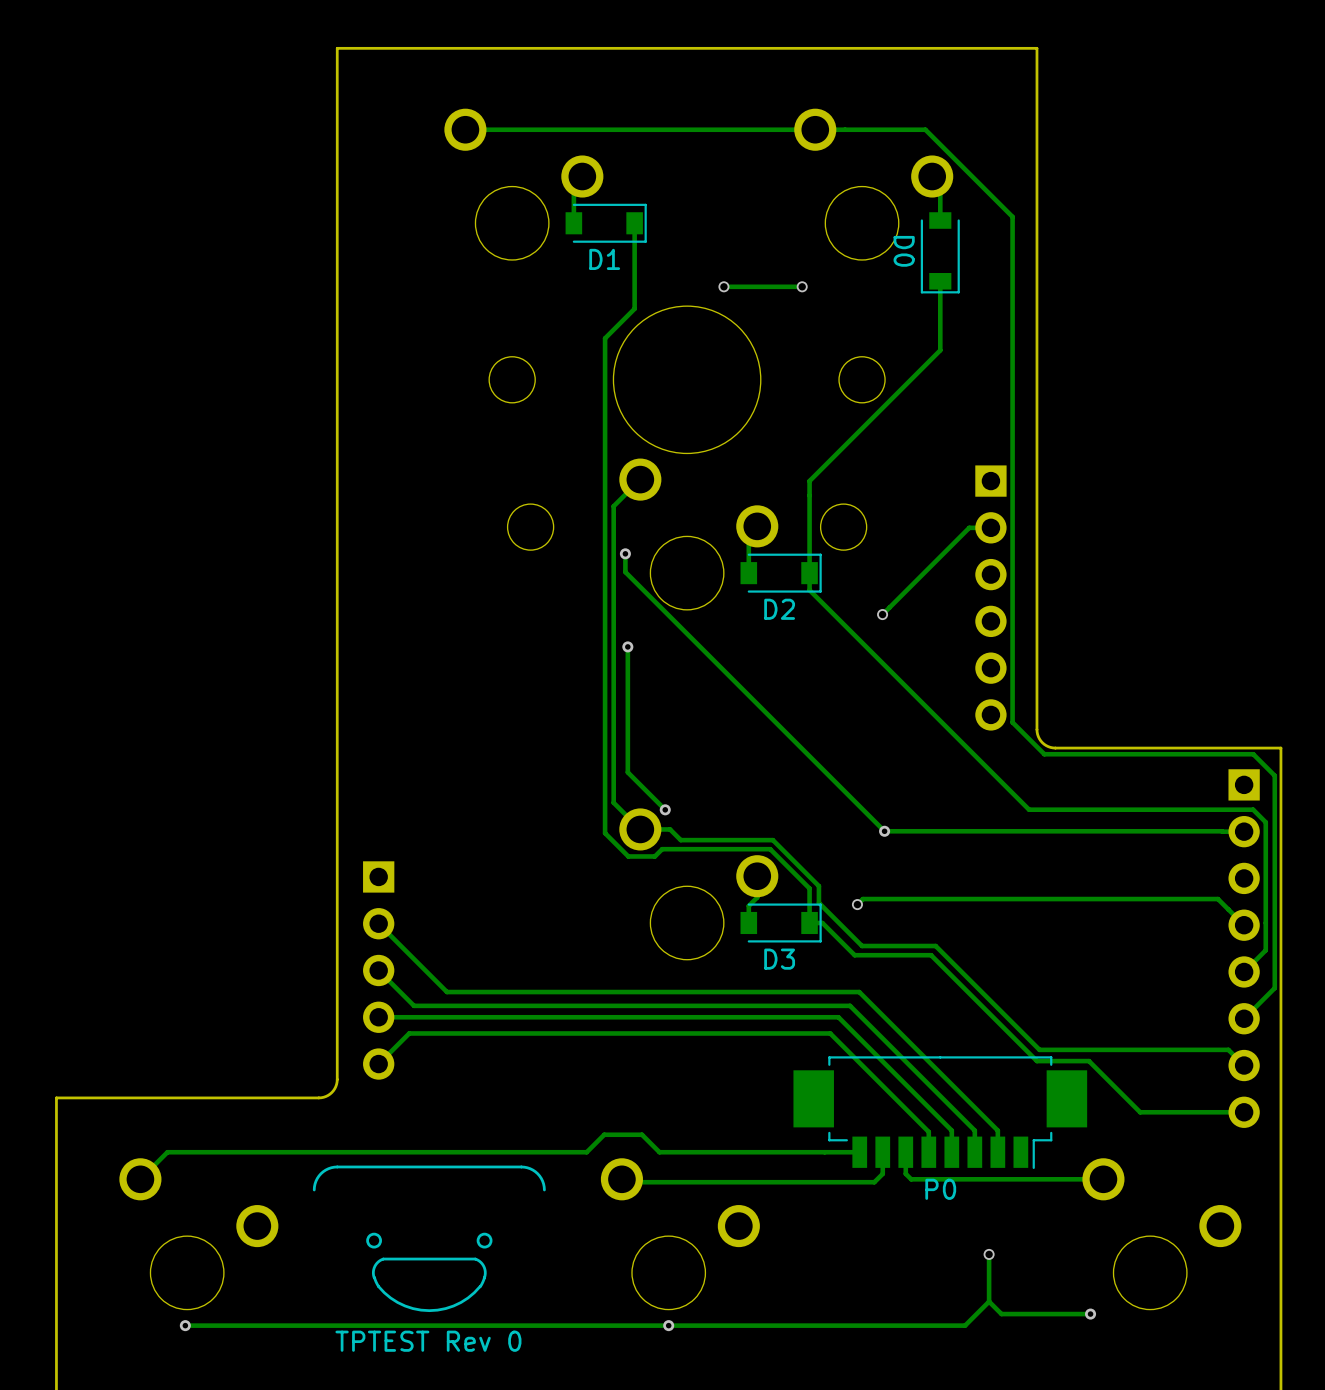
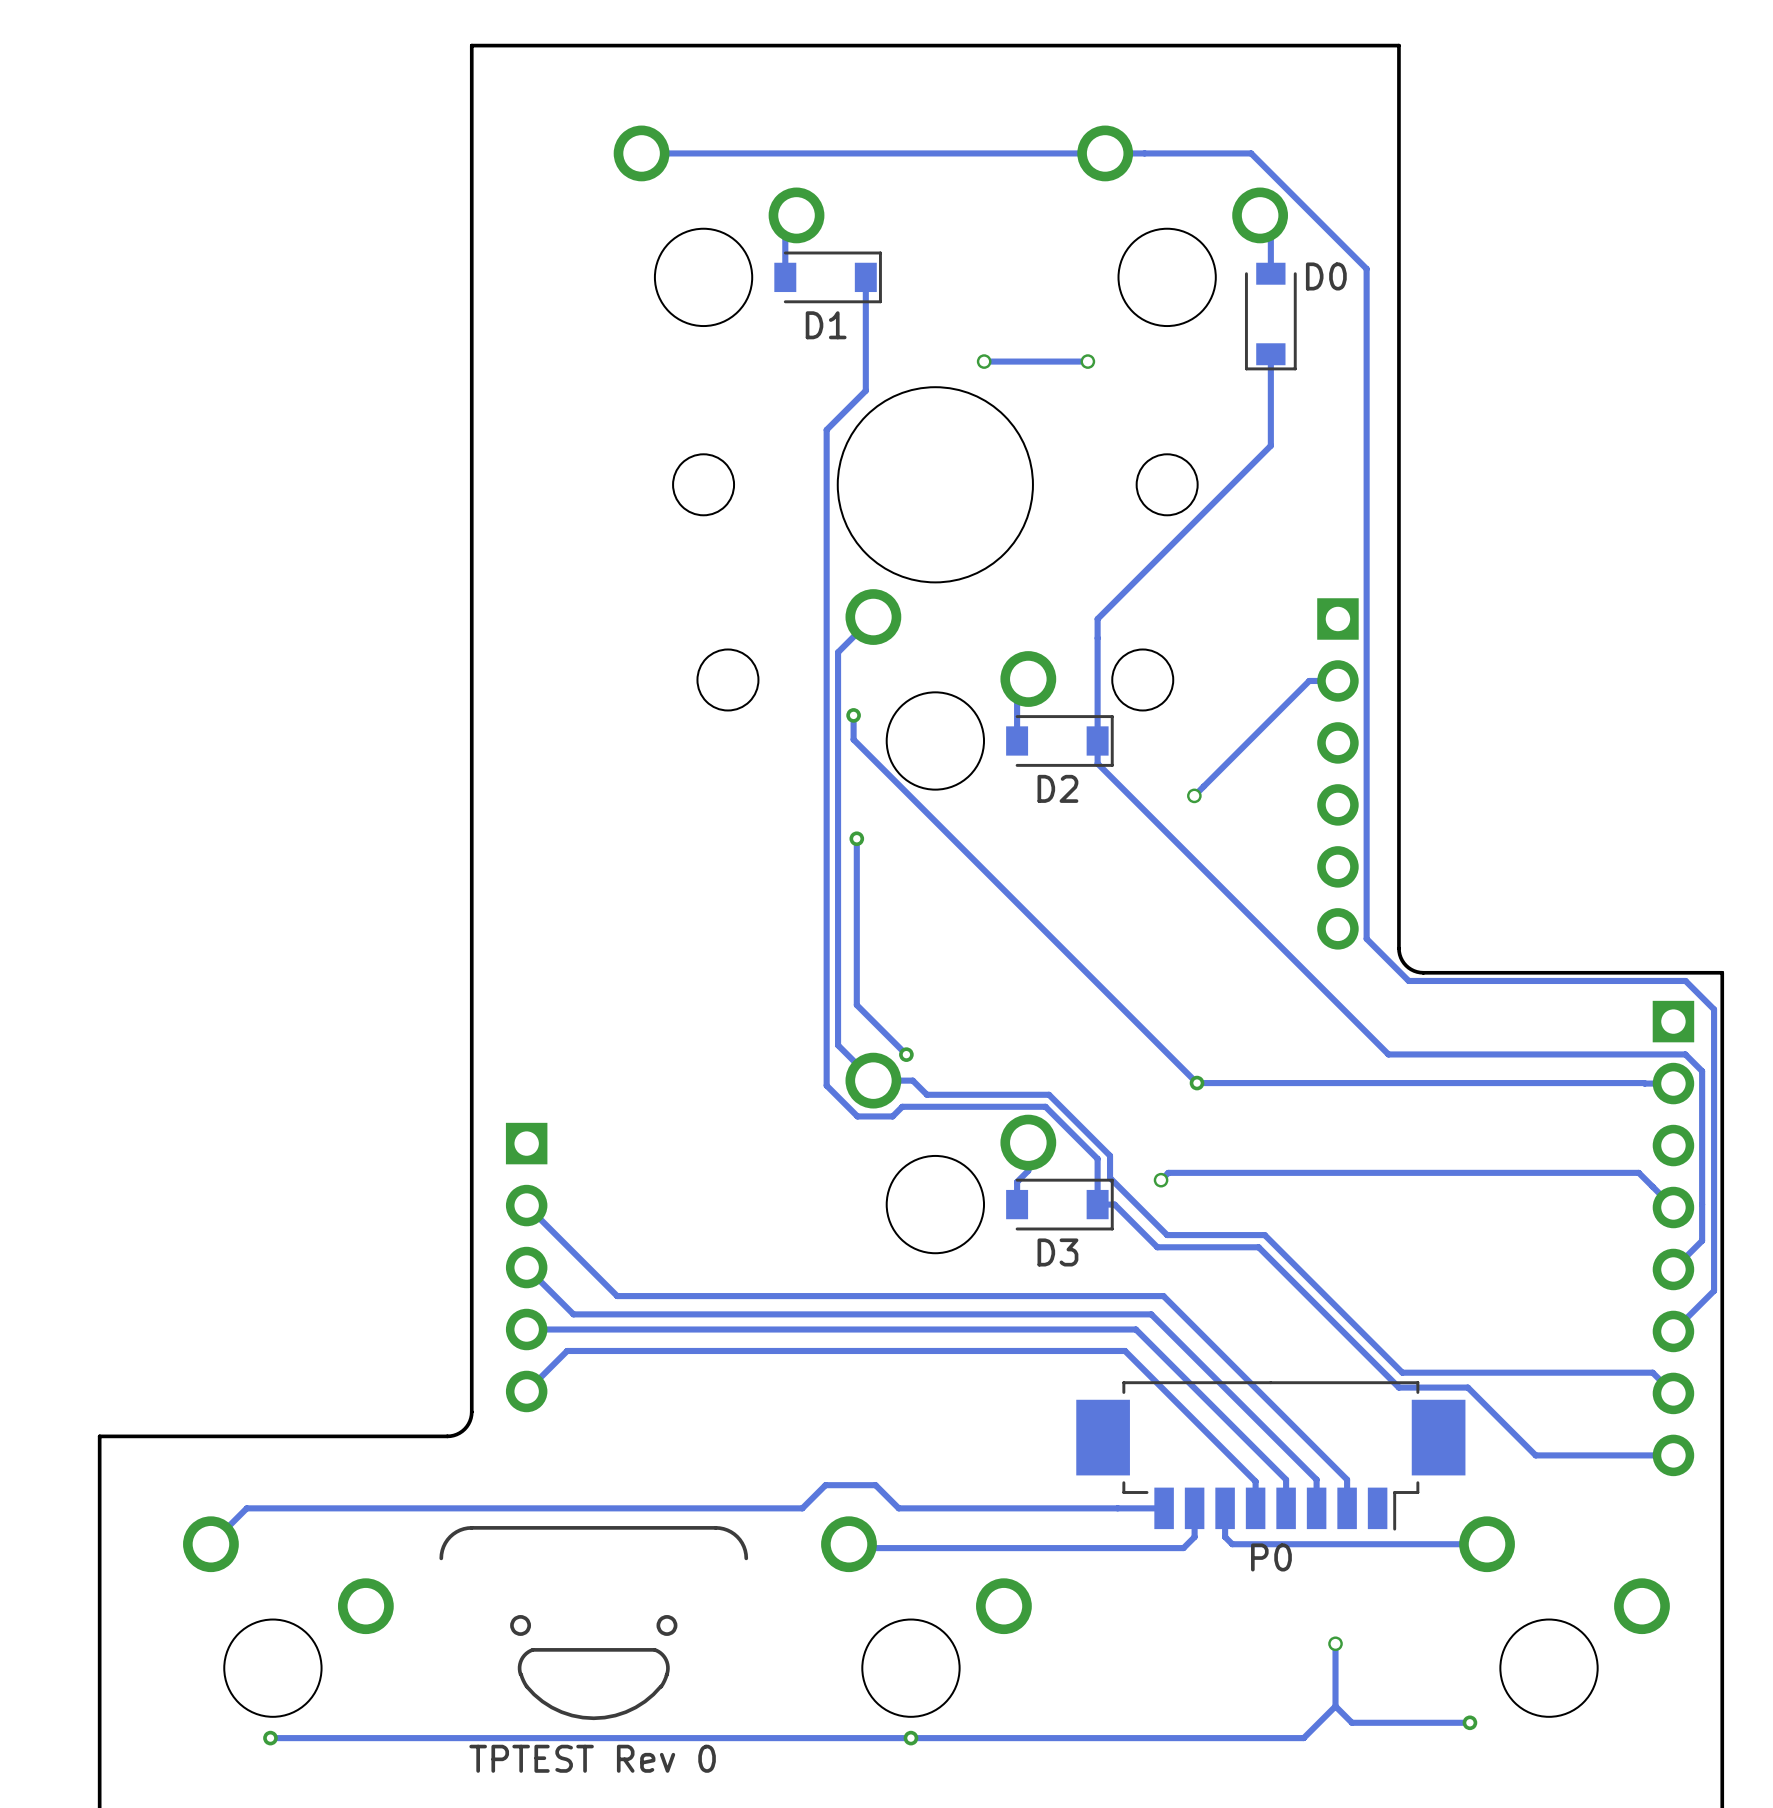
D0 name rotation: 0° (904, 251) -> 90° counterclockwise (1326, 276)
D0 name position: D0 (904, 251) -> D0 (1326, 276)

